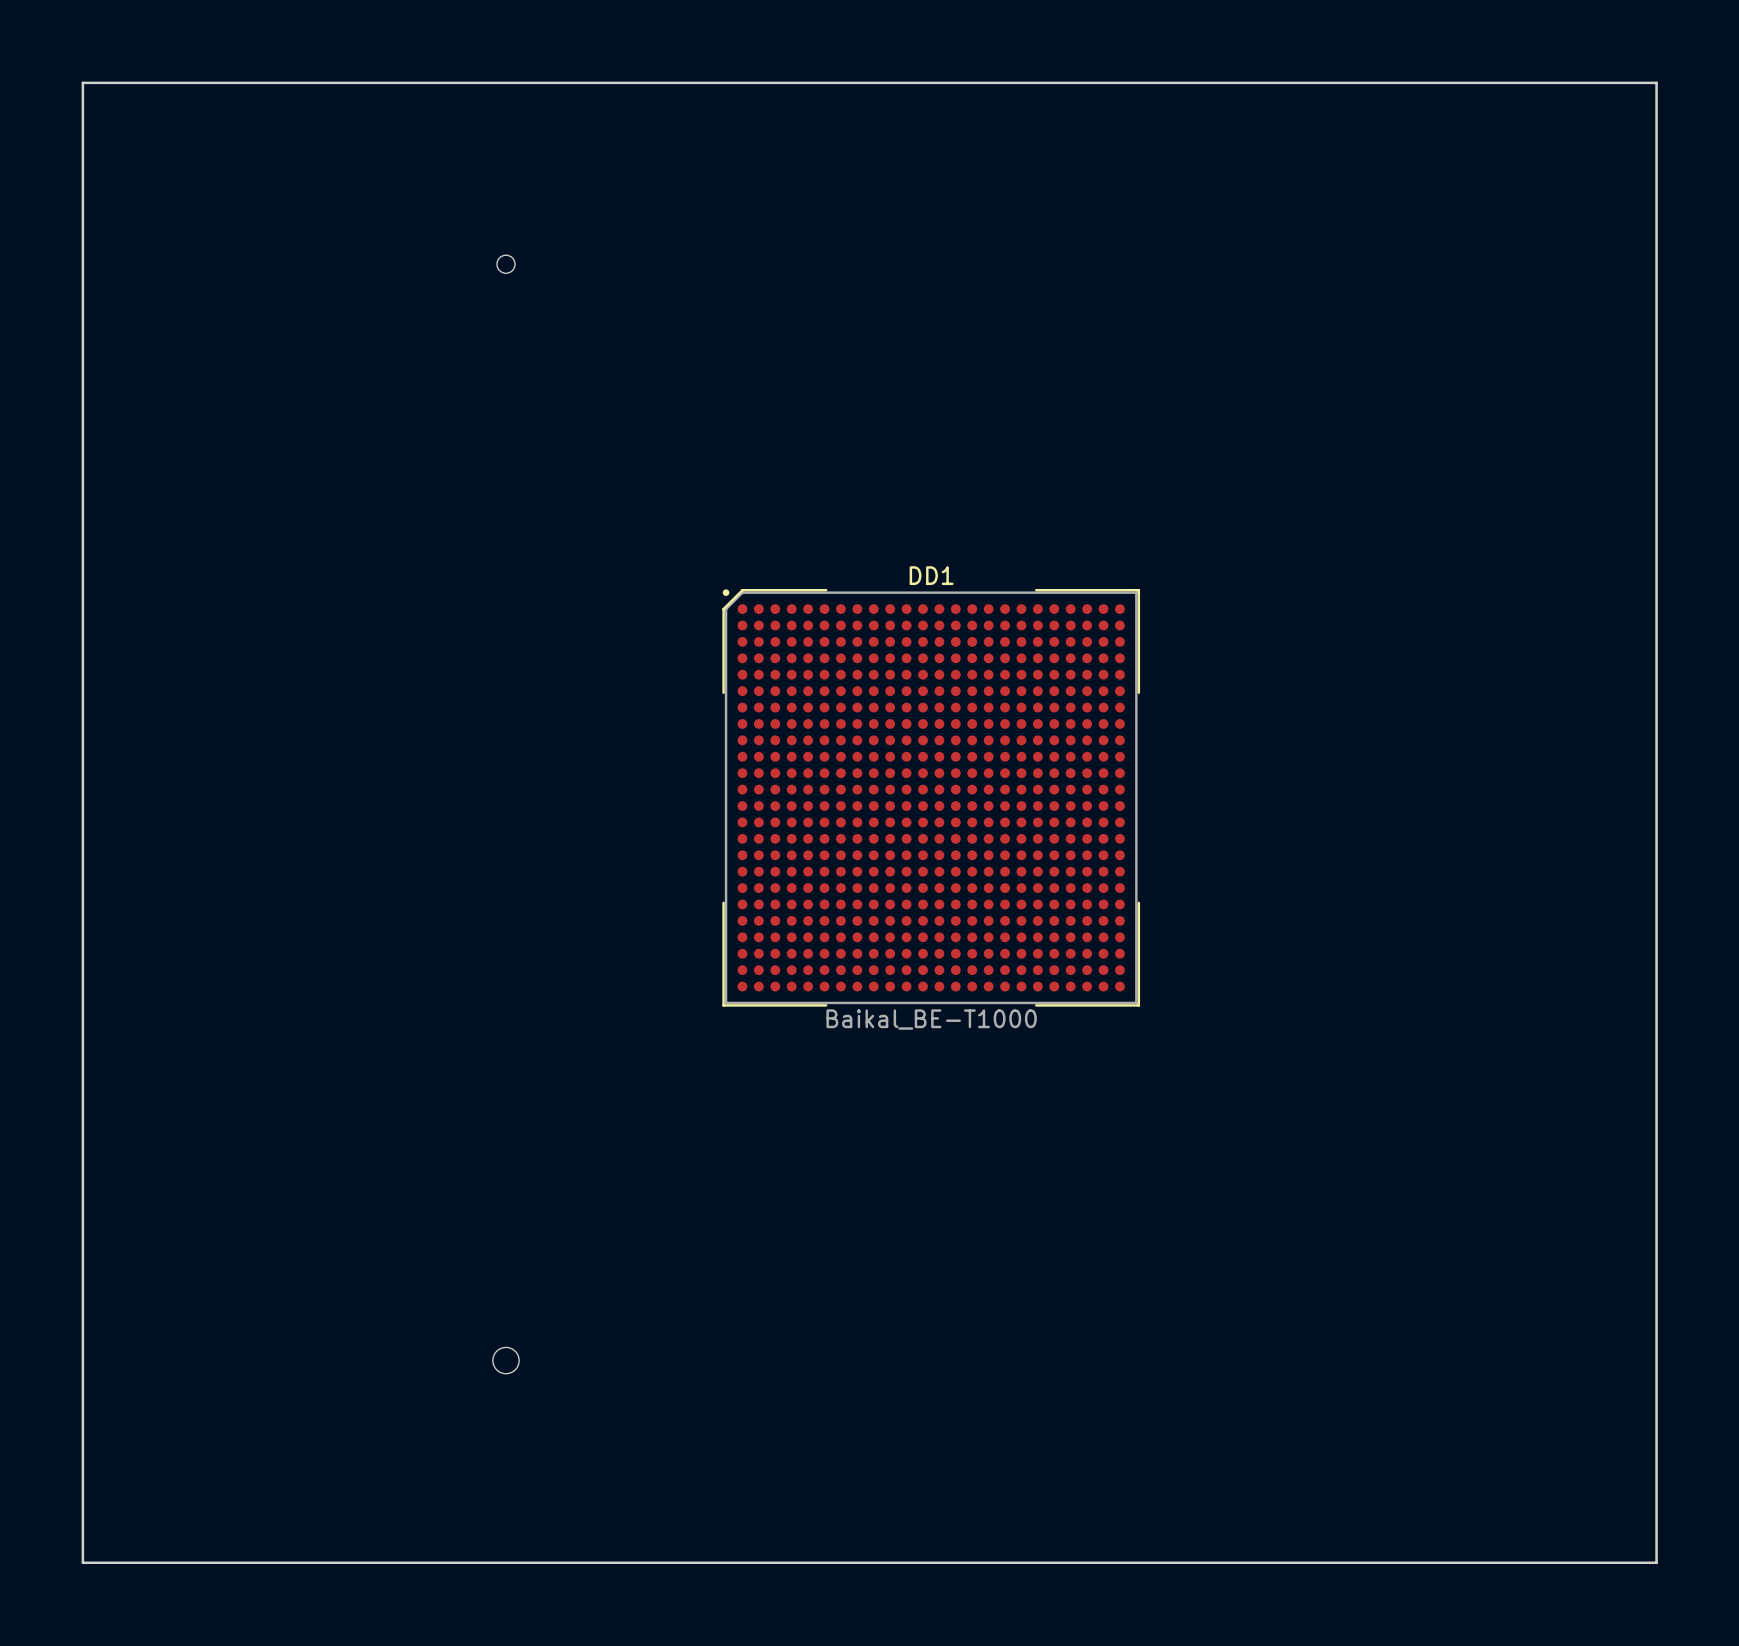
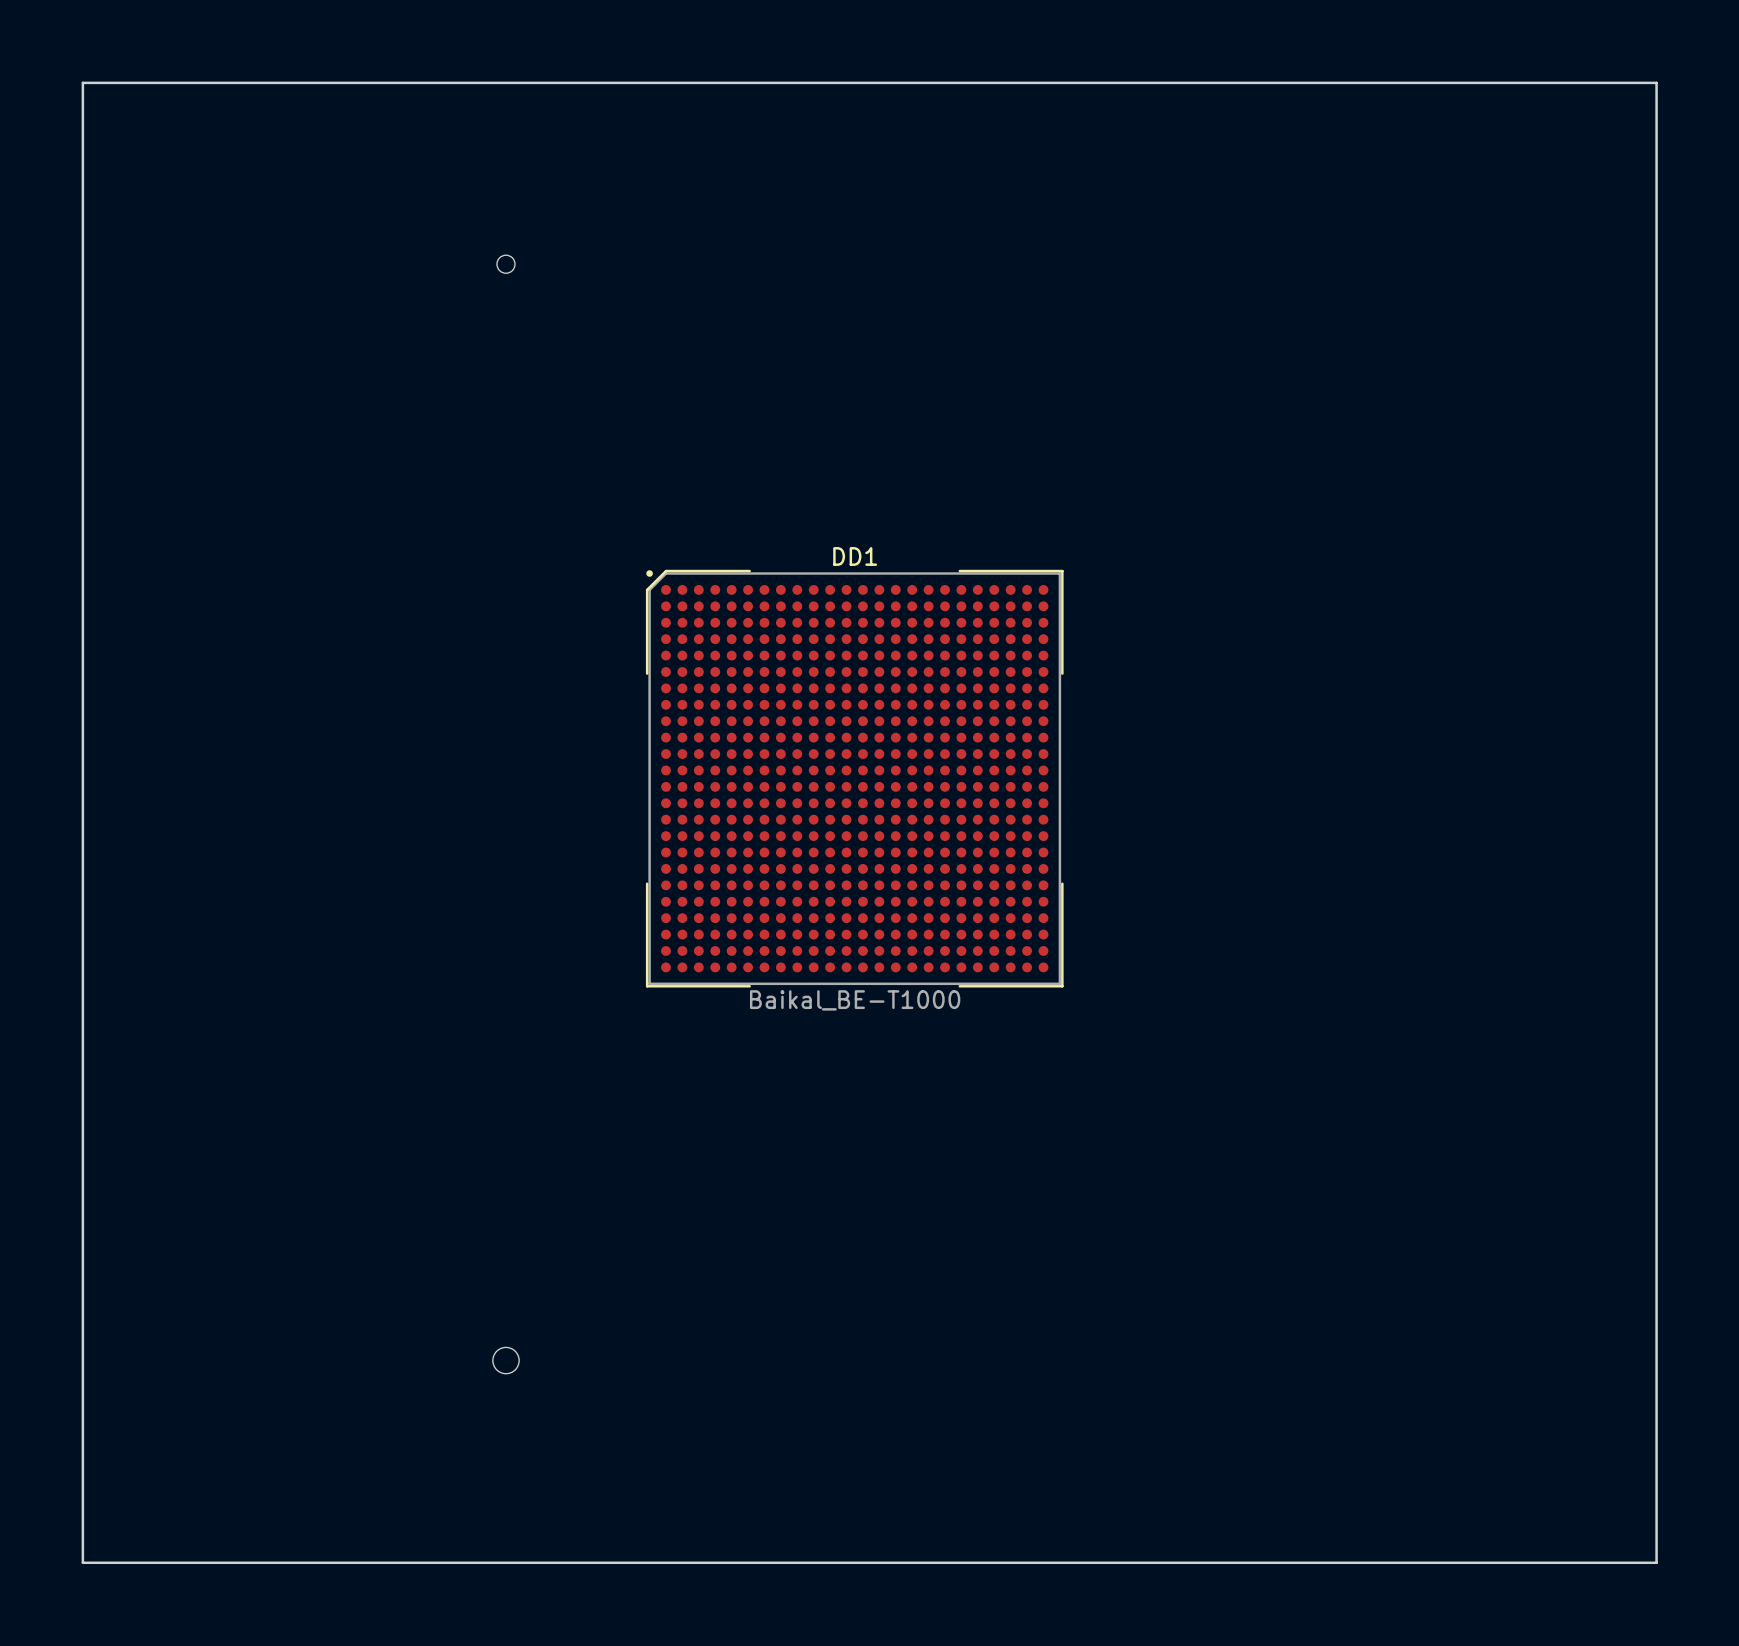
DD1 position: (931, 797) -> (854, 778)

